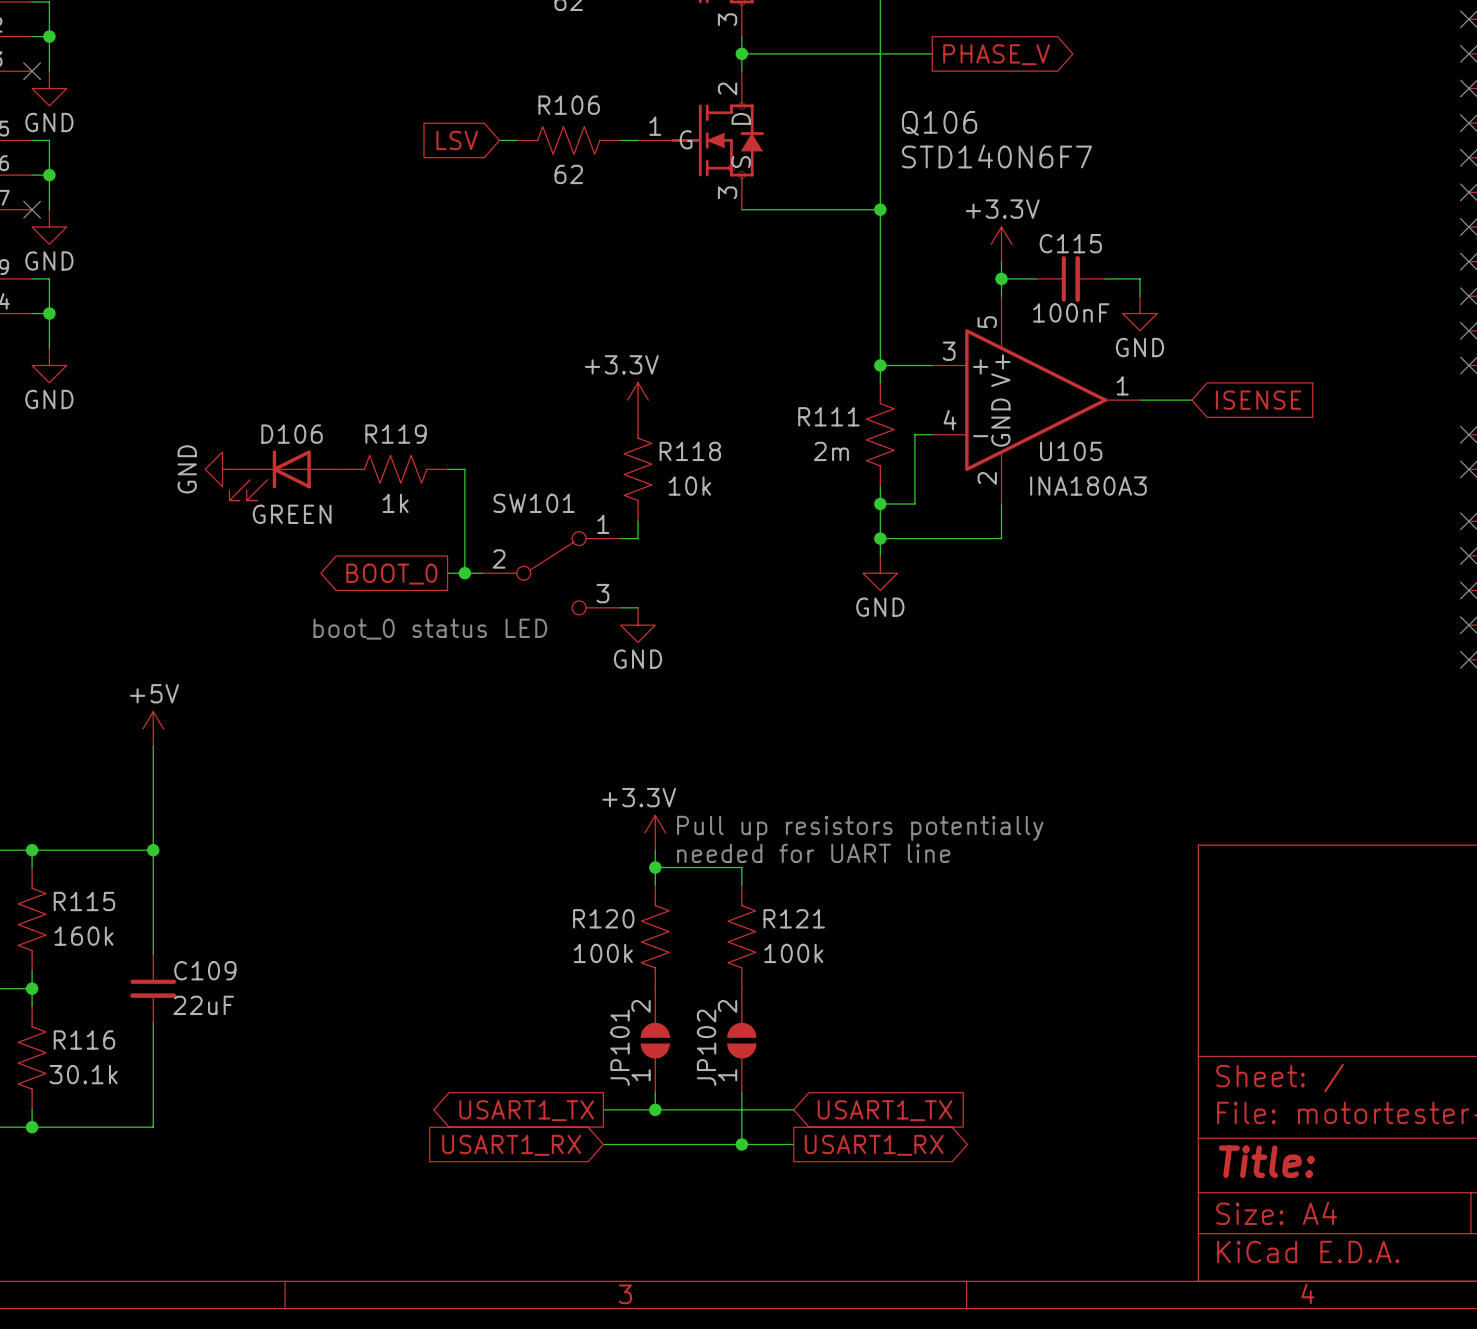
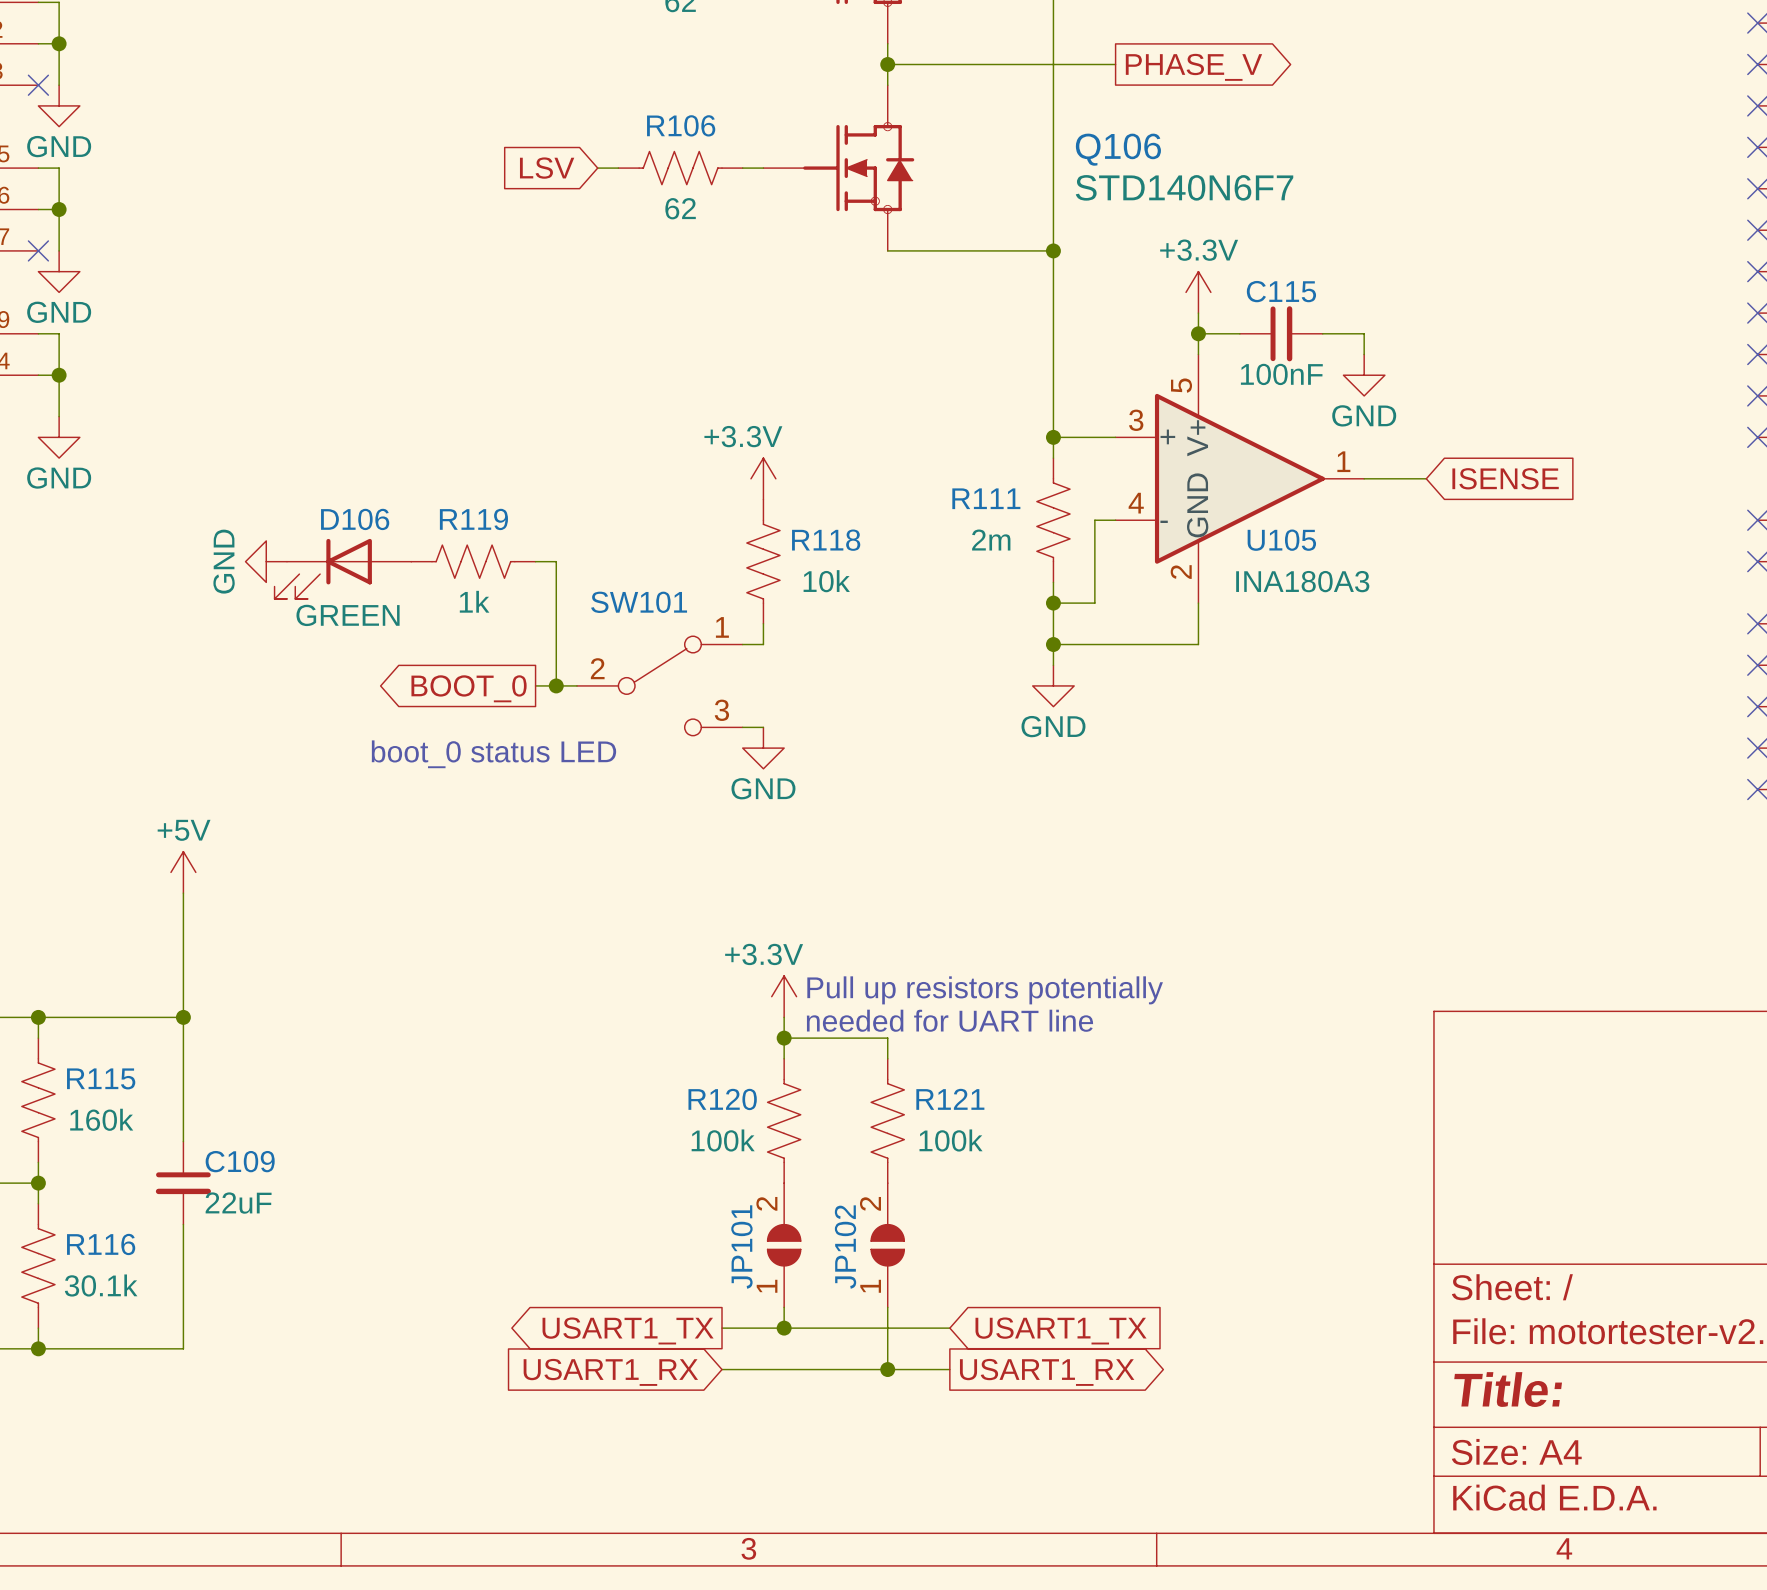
part pin number: 3 (727, 19) -> none
Q106 pin number: 2 (727, 88) -> none
Q106 pin name: D (741, 118) -> none
Q106 pin number: 1 (655, 126) -> none
Q106 pin name: G (686, 139) -> none
Q106 pin name: S (741, 162) -> none
Q106 pin number: 3 (727, 192) -> none

